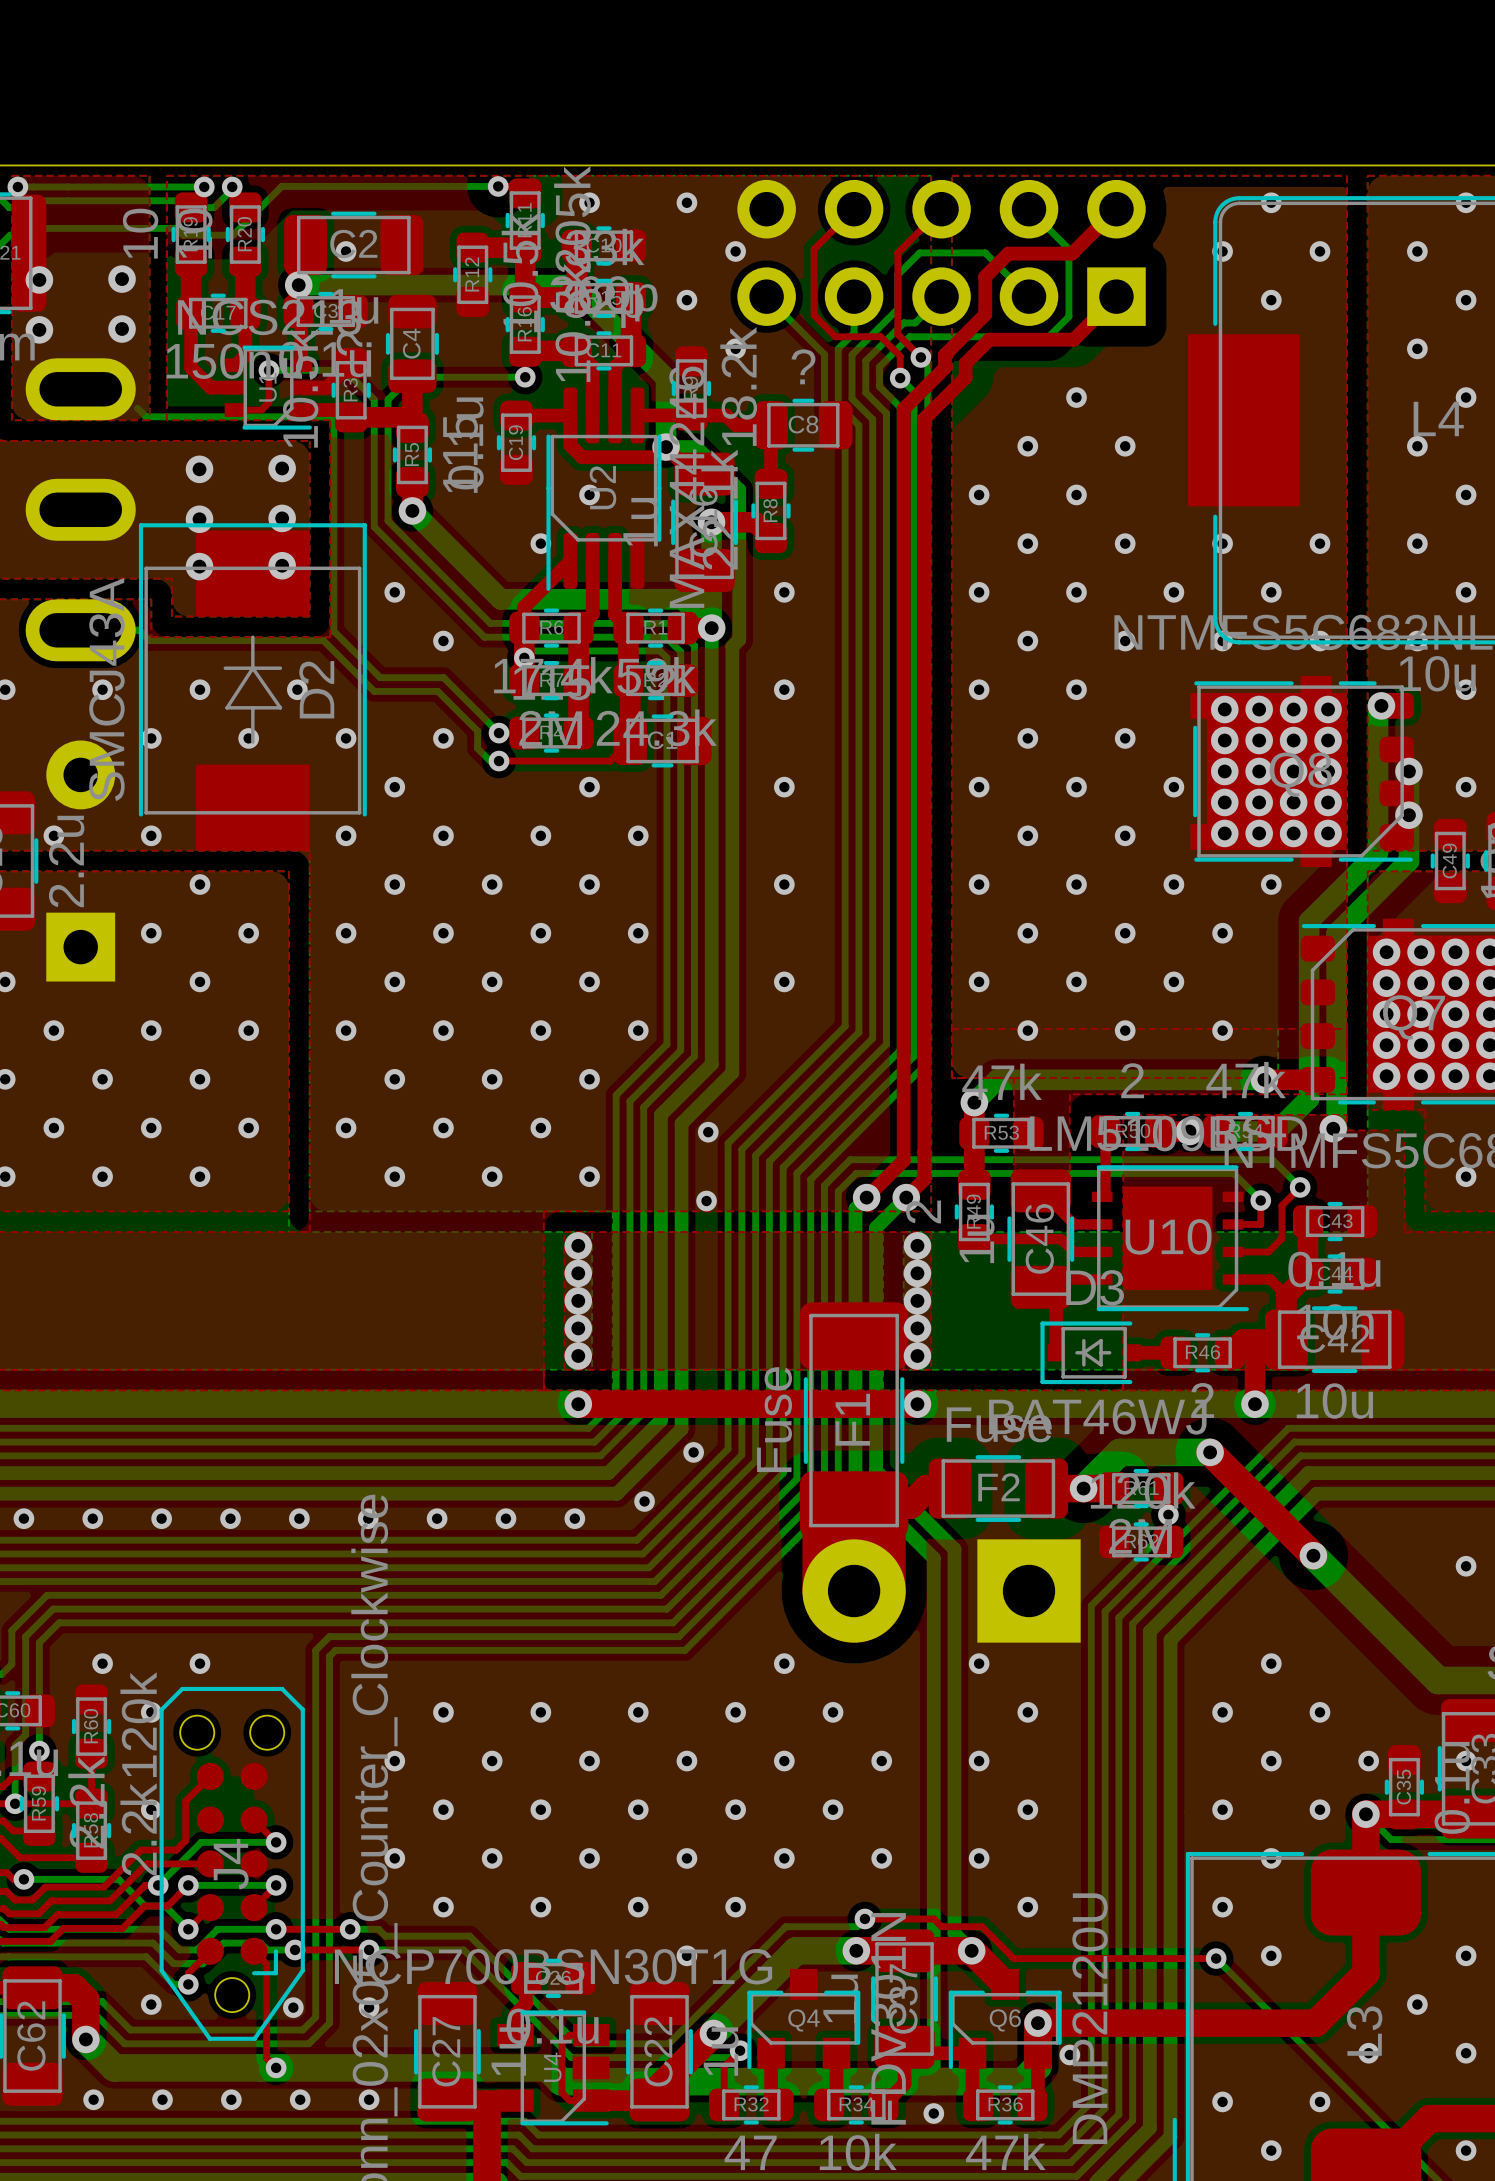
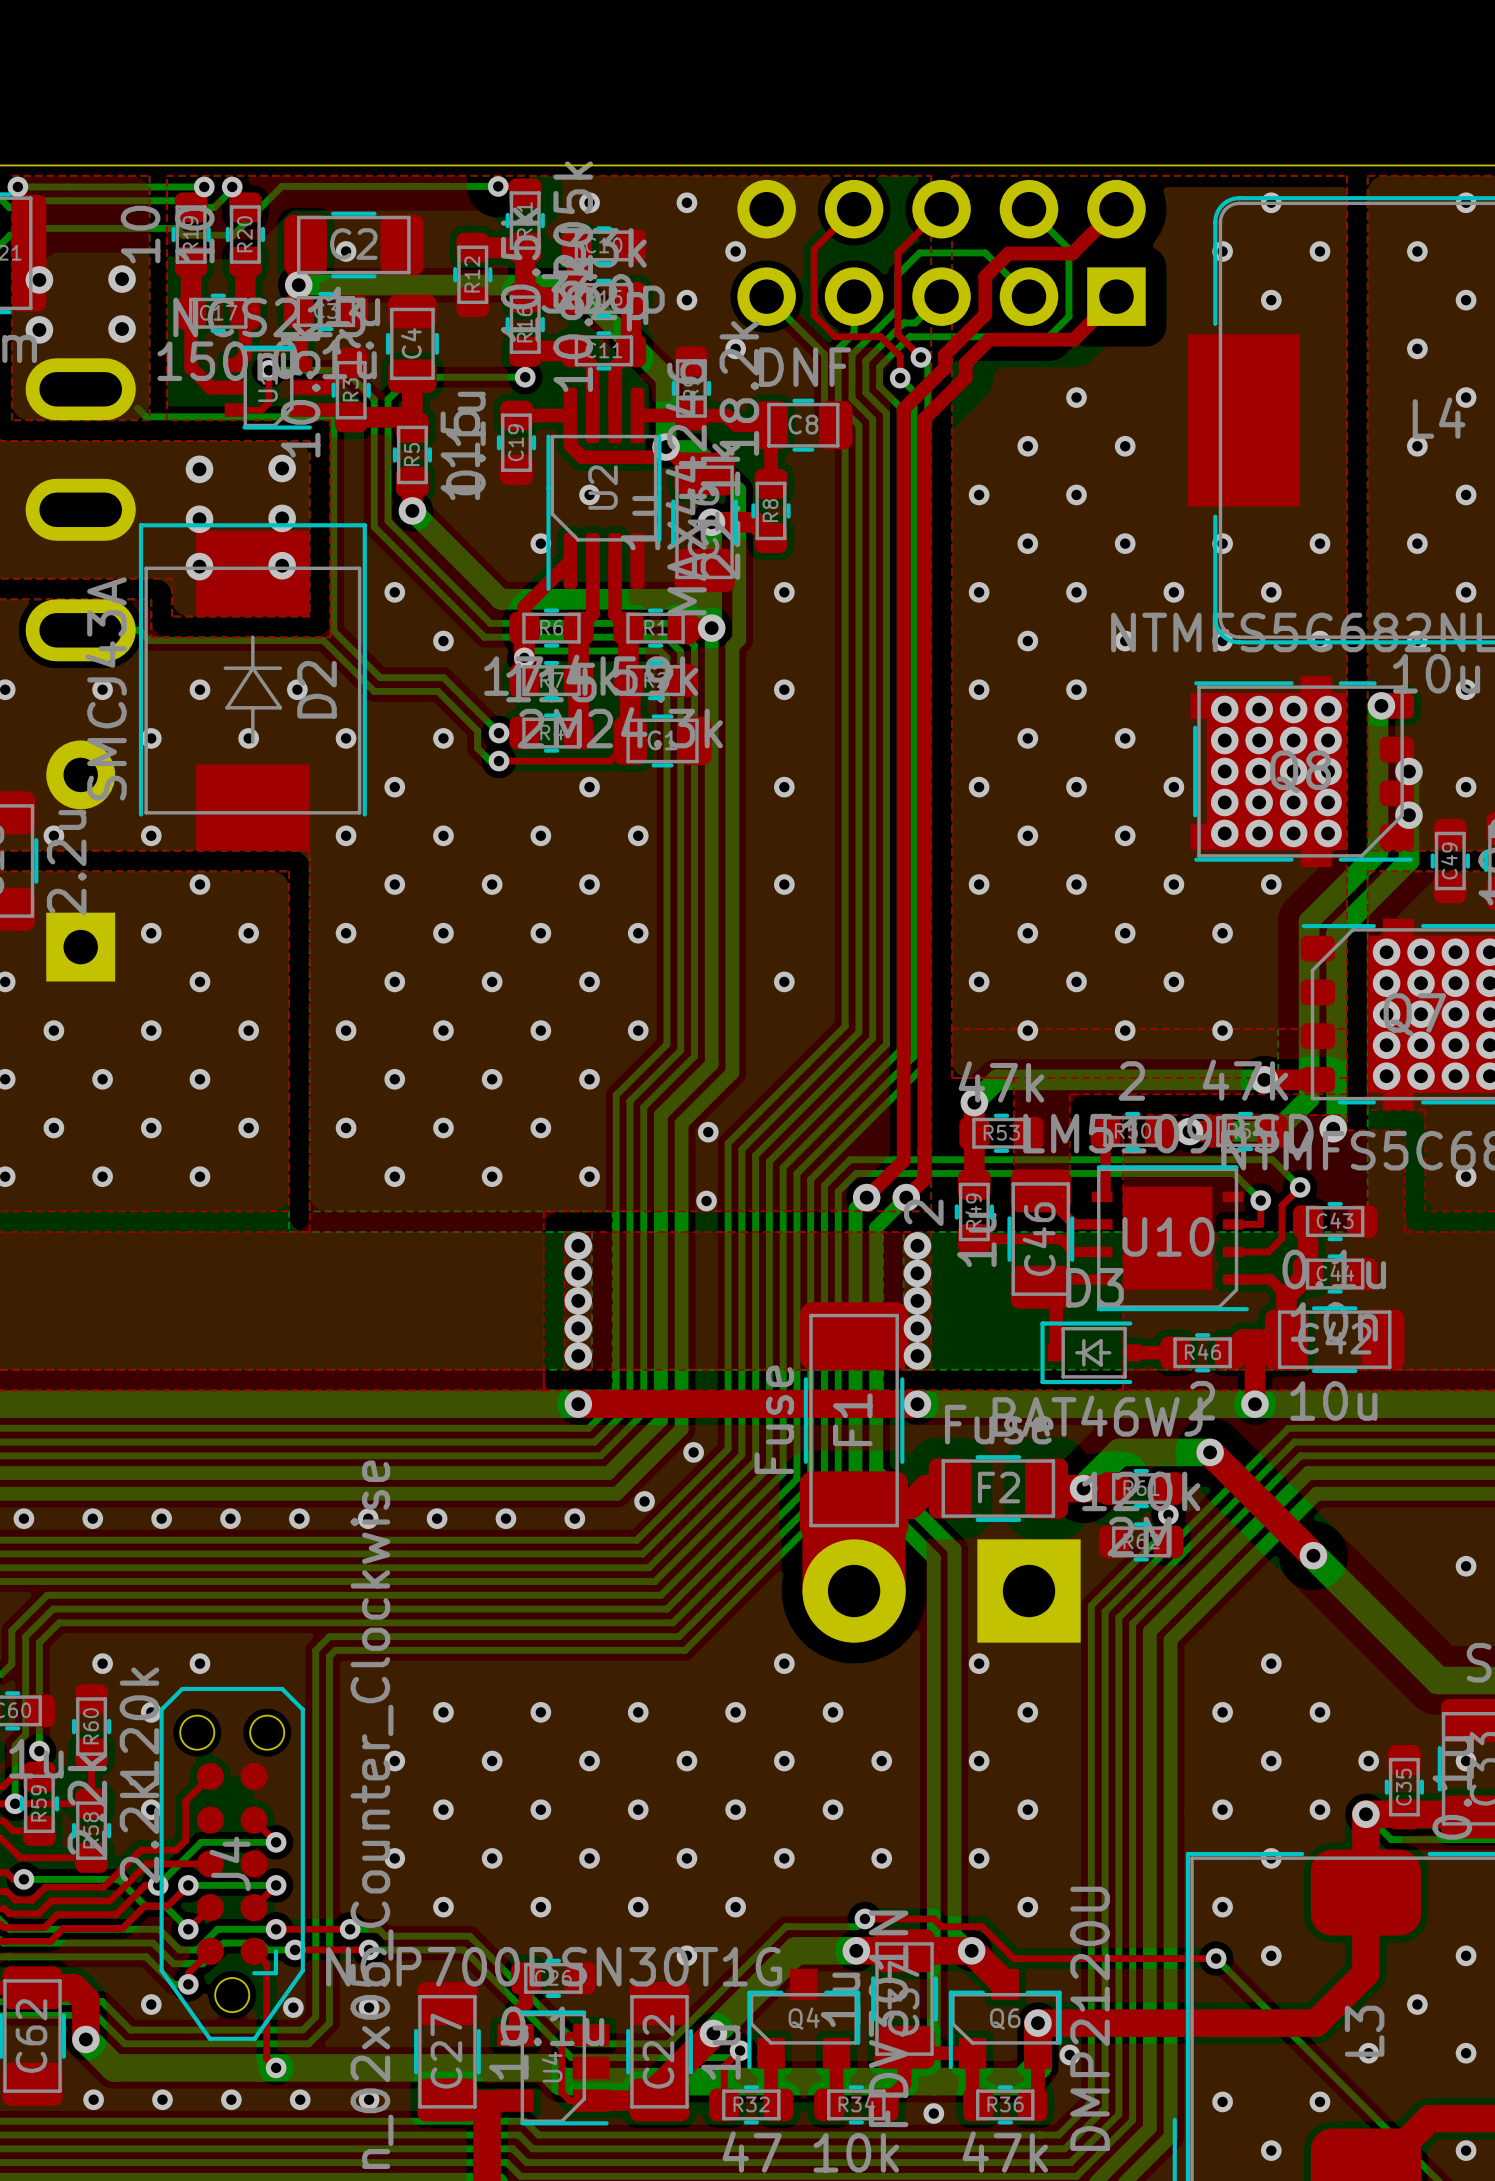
C8 value: ? (803, 366) -> DNF (805, 367)

